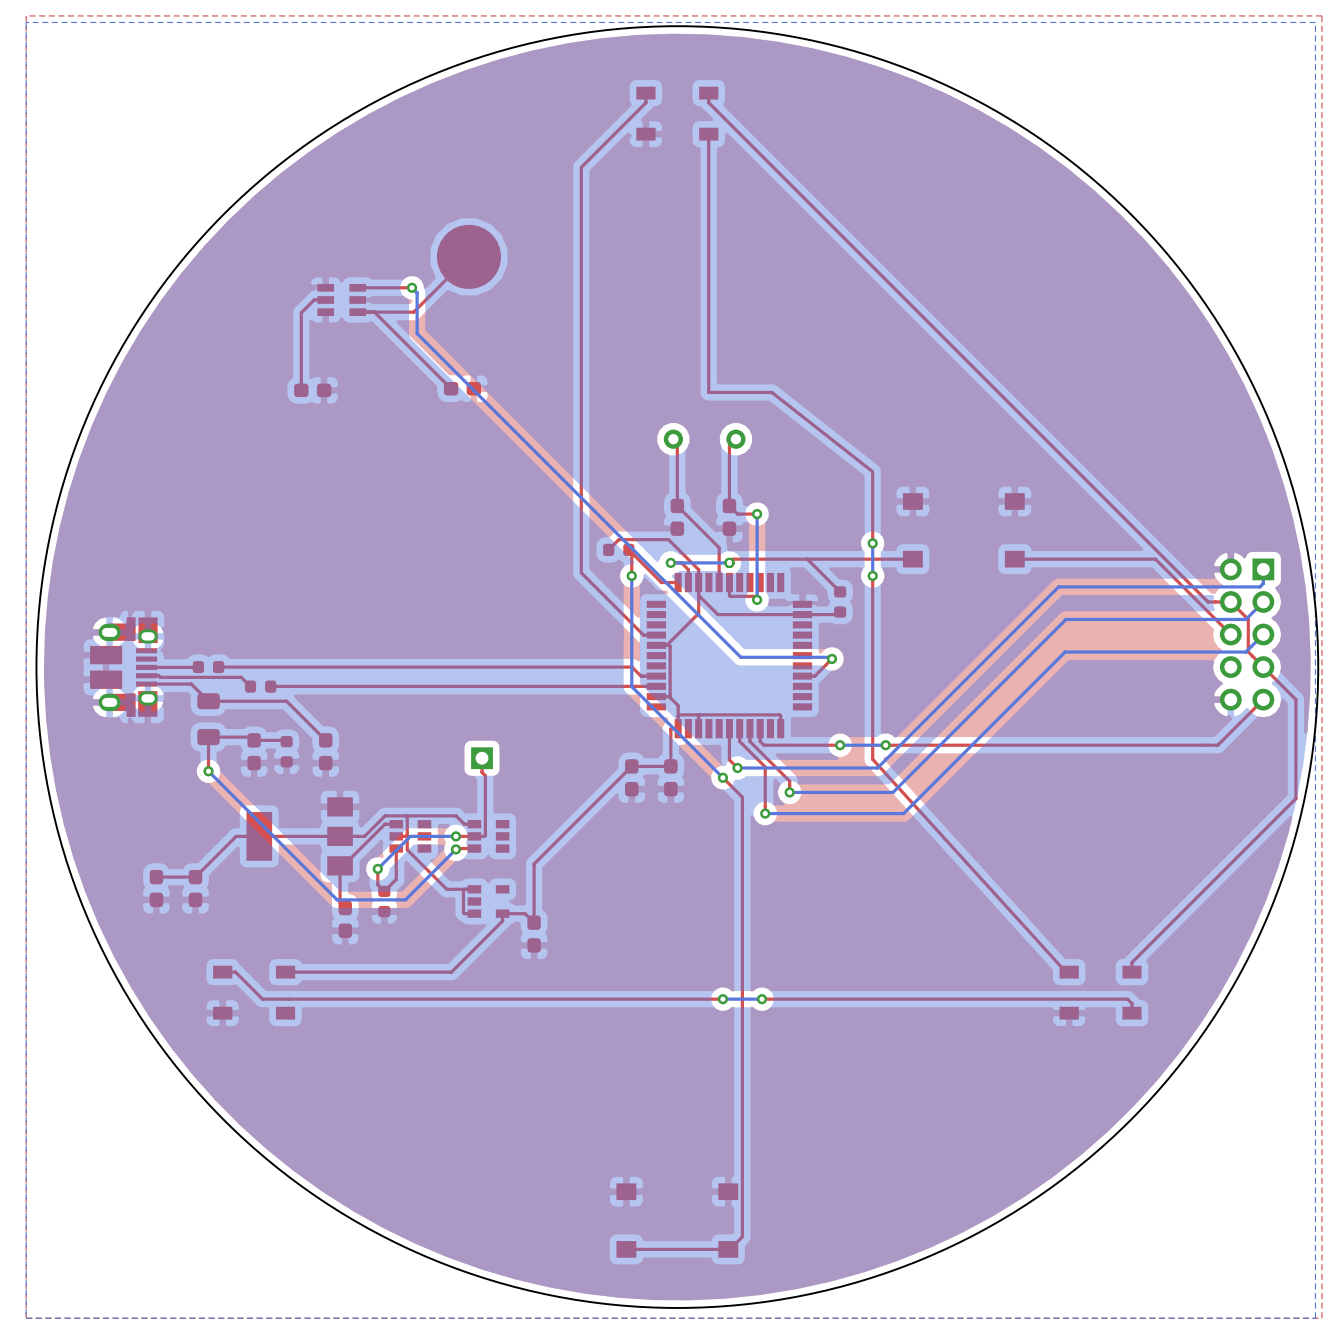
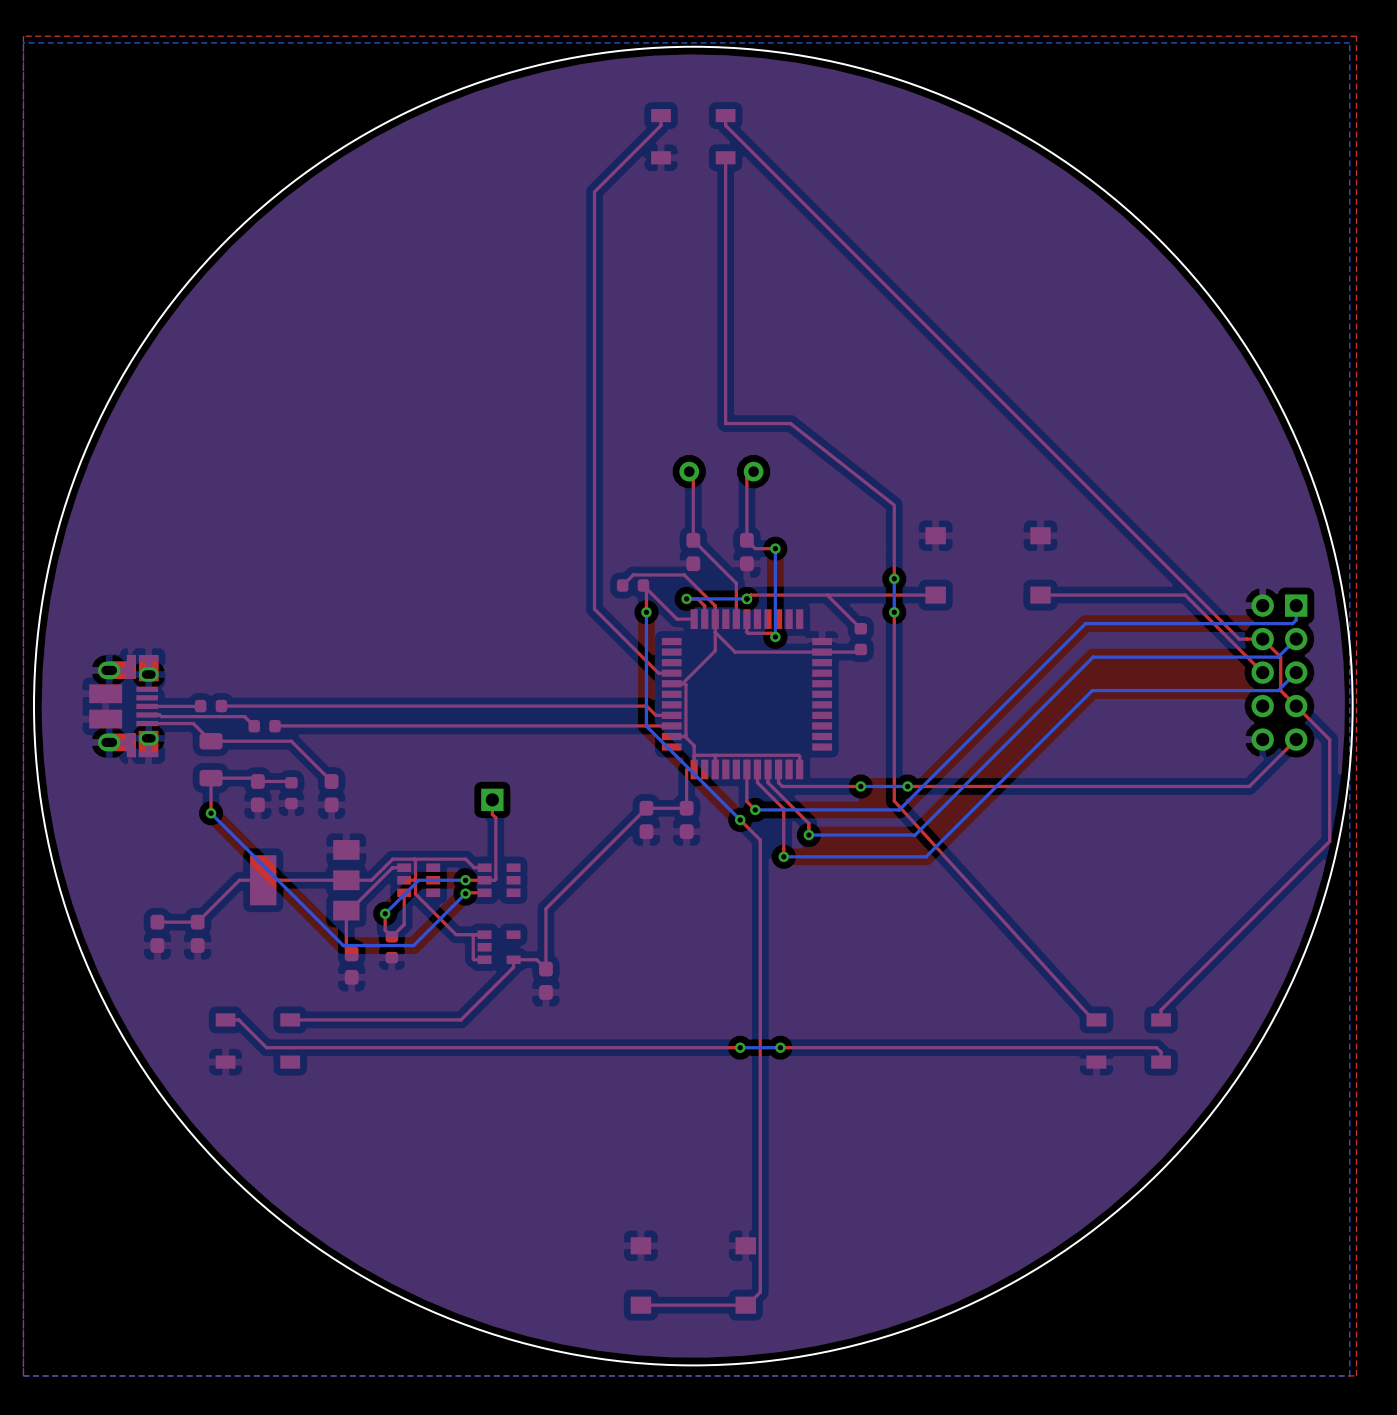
top track: (468, 256) (413, 312) (357, 312) -> none
part: (468, 256) -> none
top track: (412, 287) (357, 287) -> none
bottom track: (412, 287) (417, 292) (417, 333) (740, 657) (830, 657) (831, 658) -> none
via: (412, 287) -> none
top track: (325, 299) (314, 299) (301, 312) (301, 390) -> none
part: (341, 299) -> none
top track: (374, 312) (451, 388) -> none
part: (462, 388) -> none
part: (312, 390) -> none
top track: (831, 658) (814, 676) (802, 676) -> none
via: (831, 658) -> none

